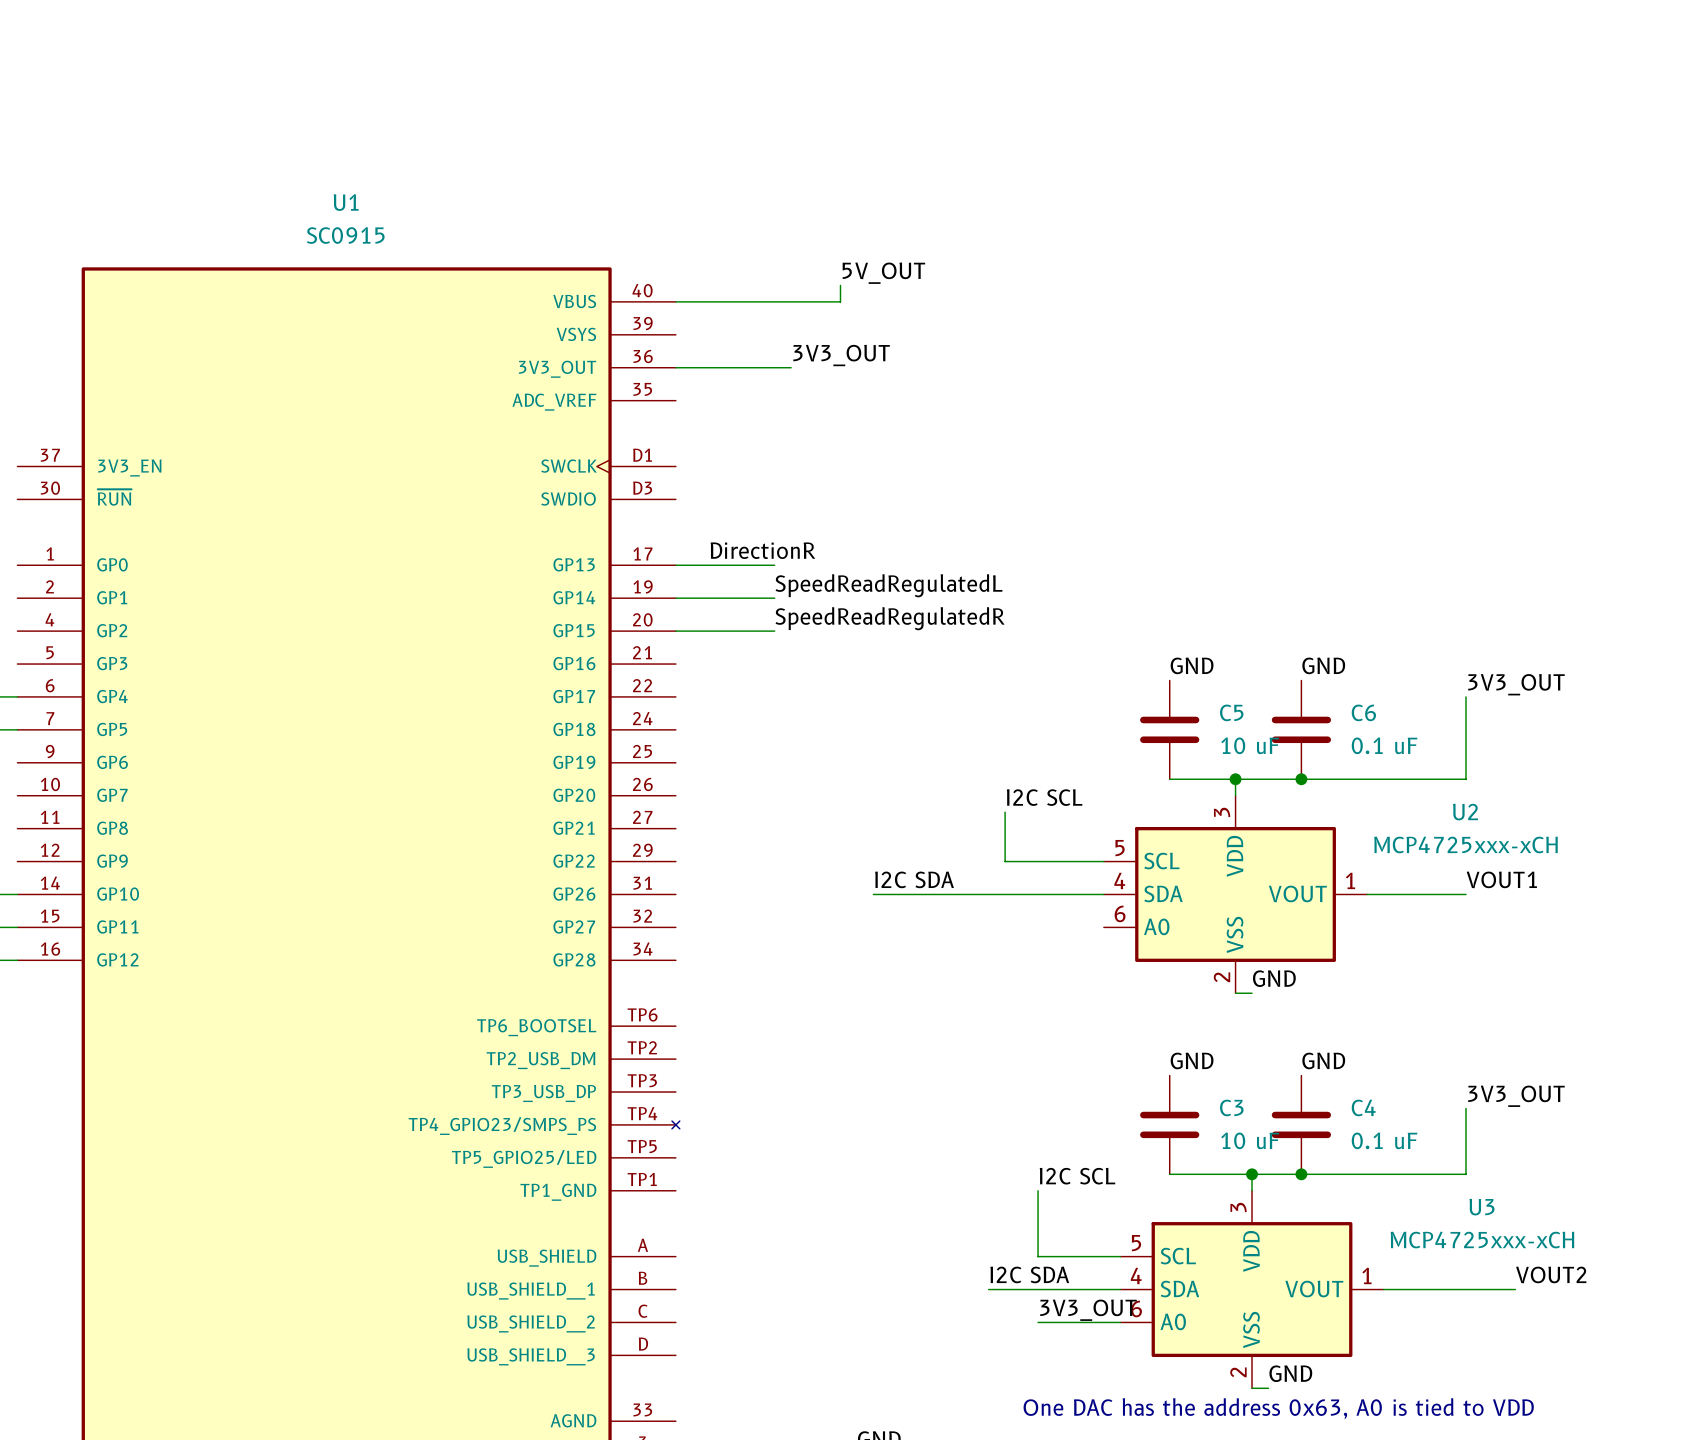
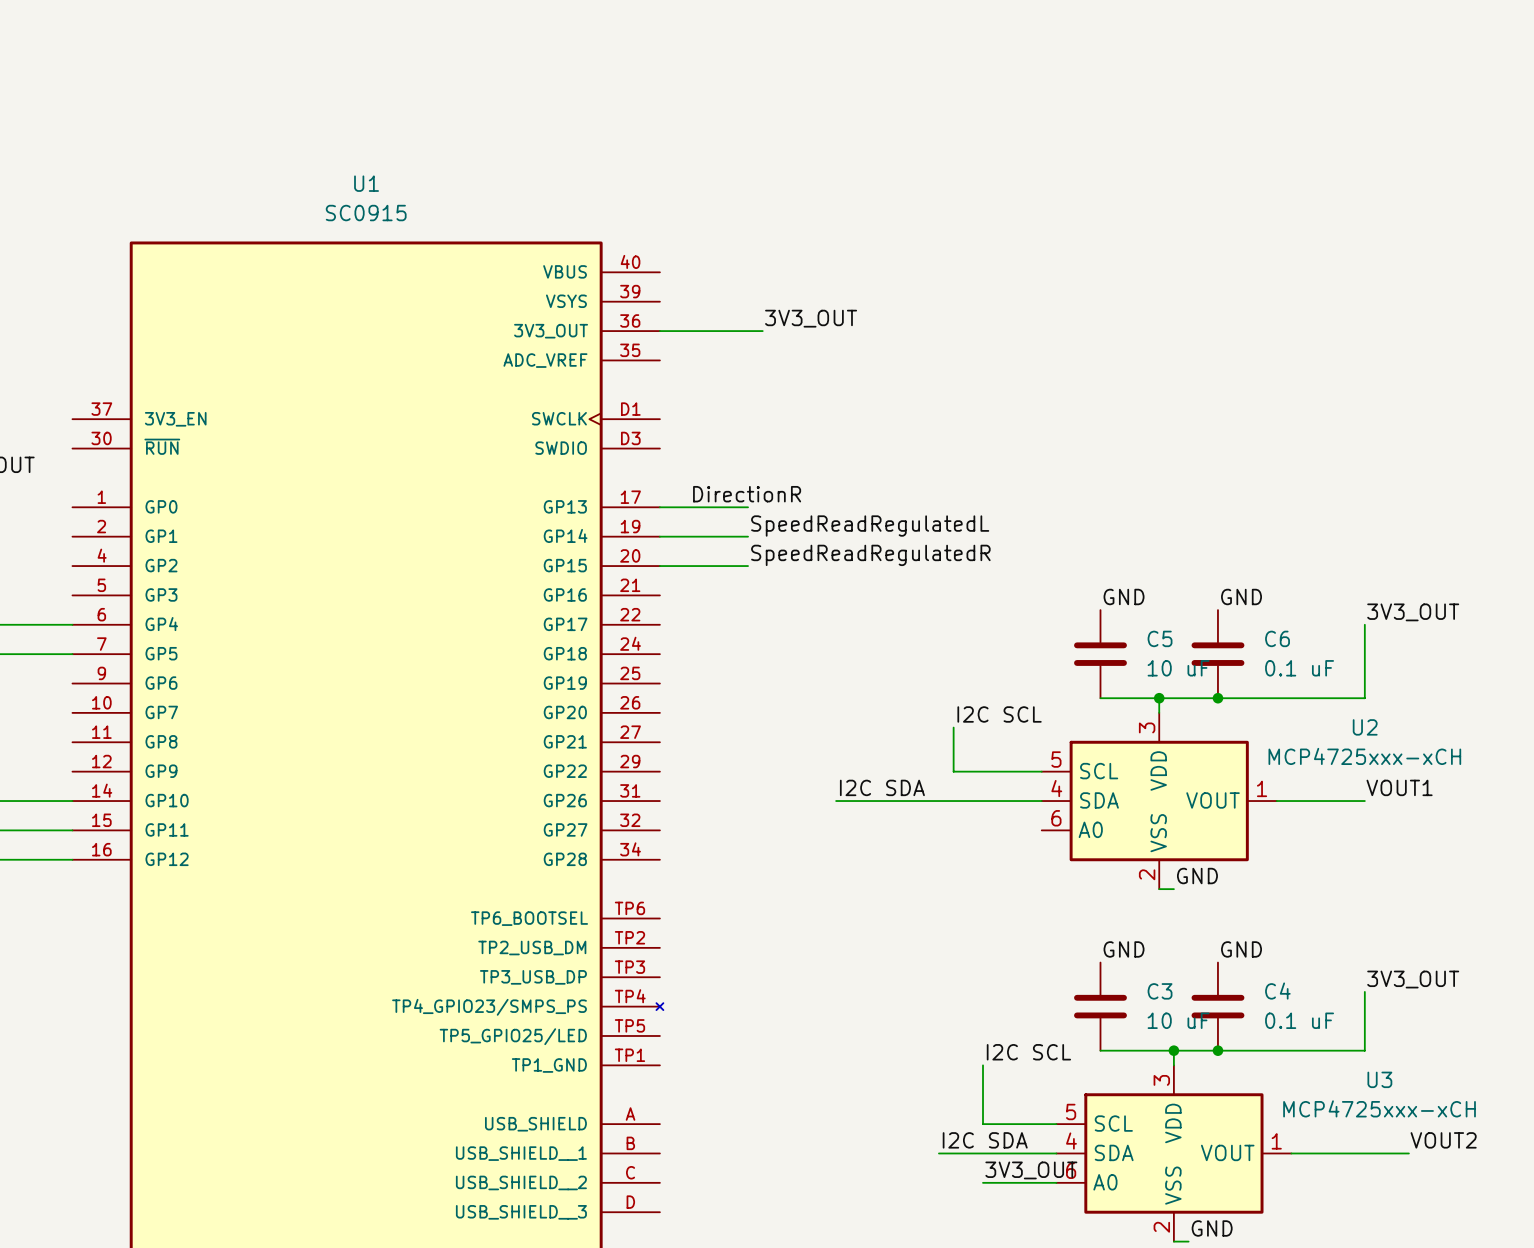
label: 5V_OUT (883, 273) -> none
wire: (840, 285) (840, 301) (675, 301) -> none

